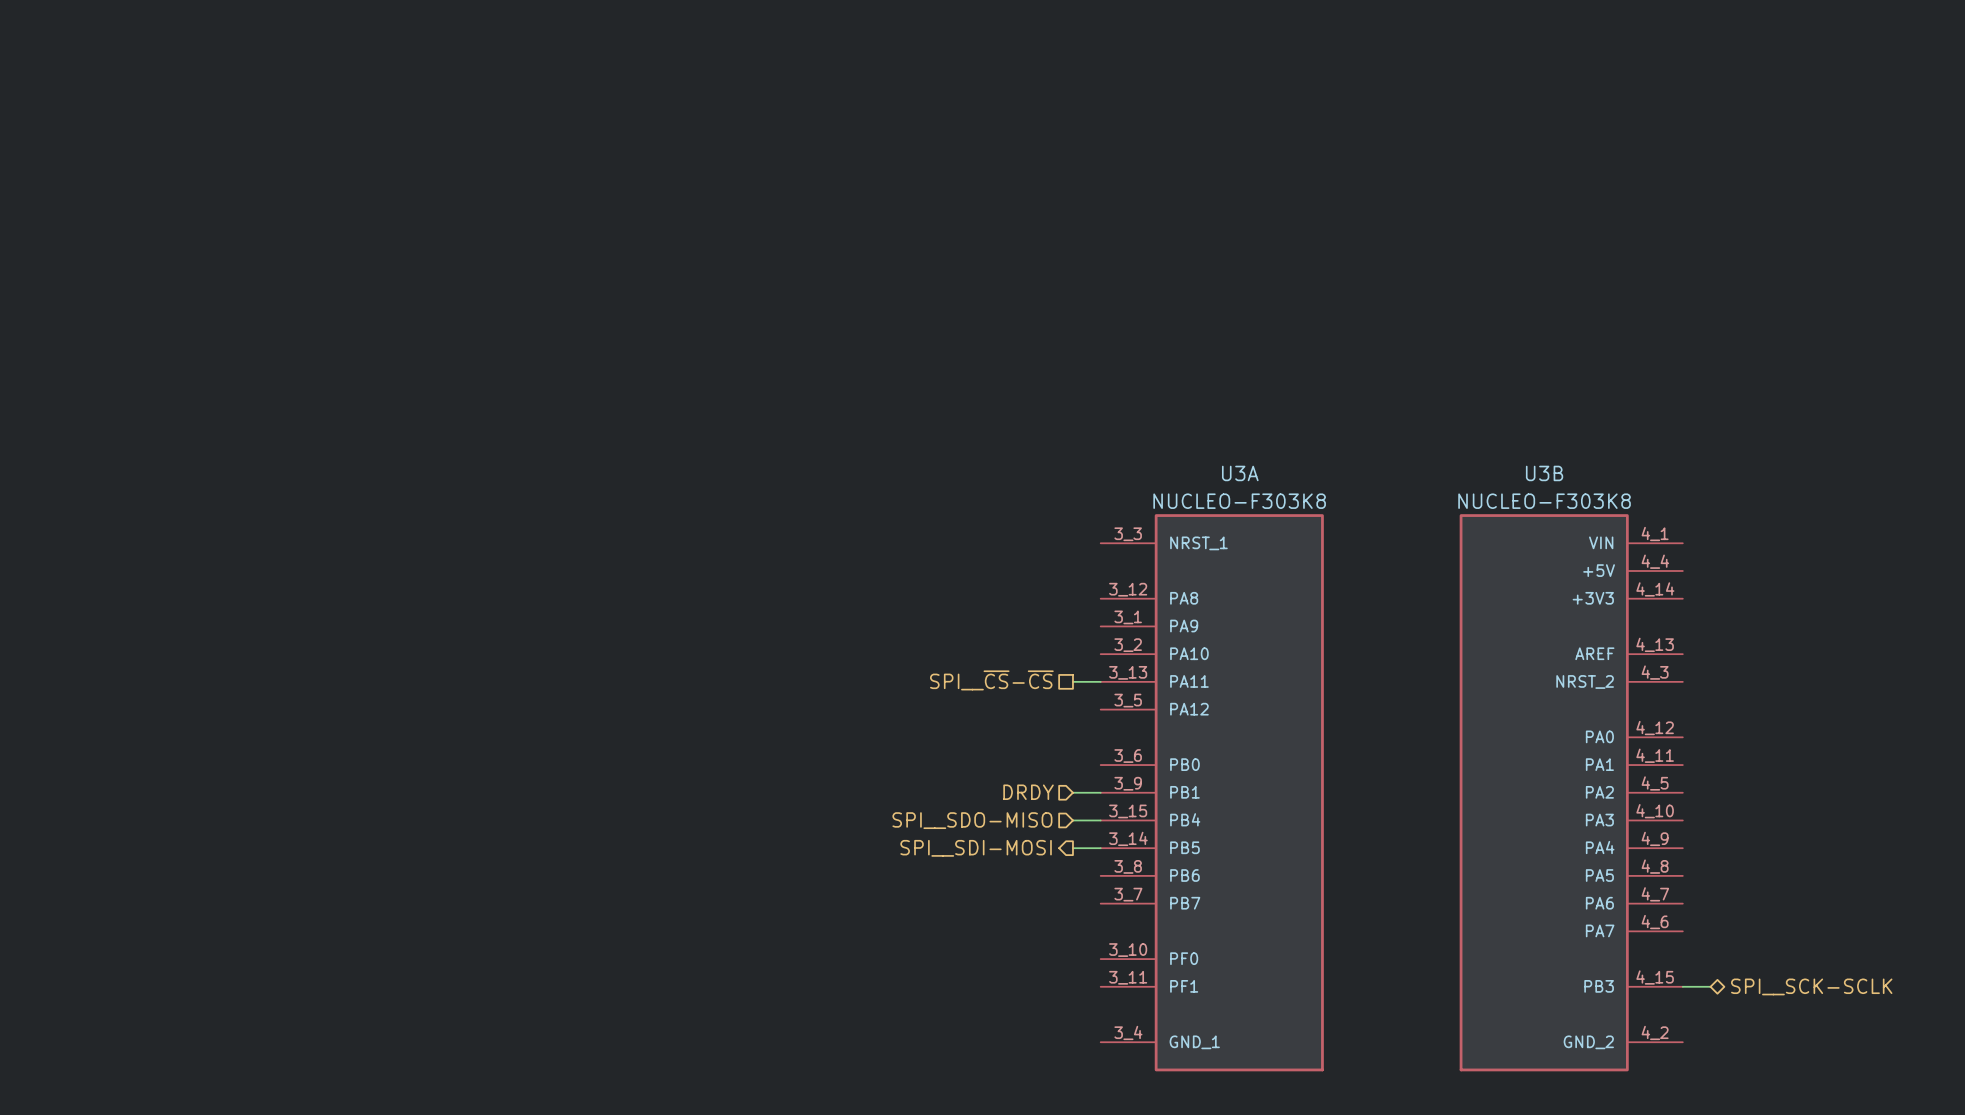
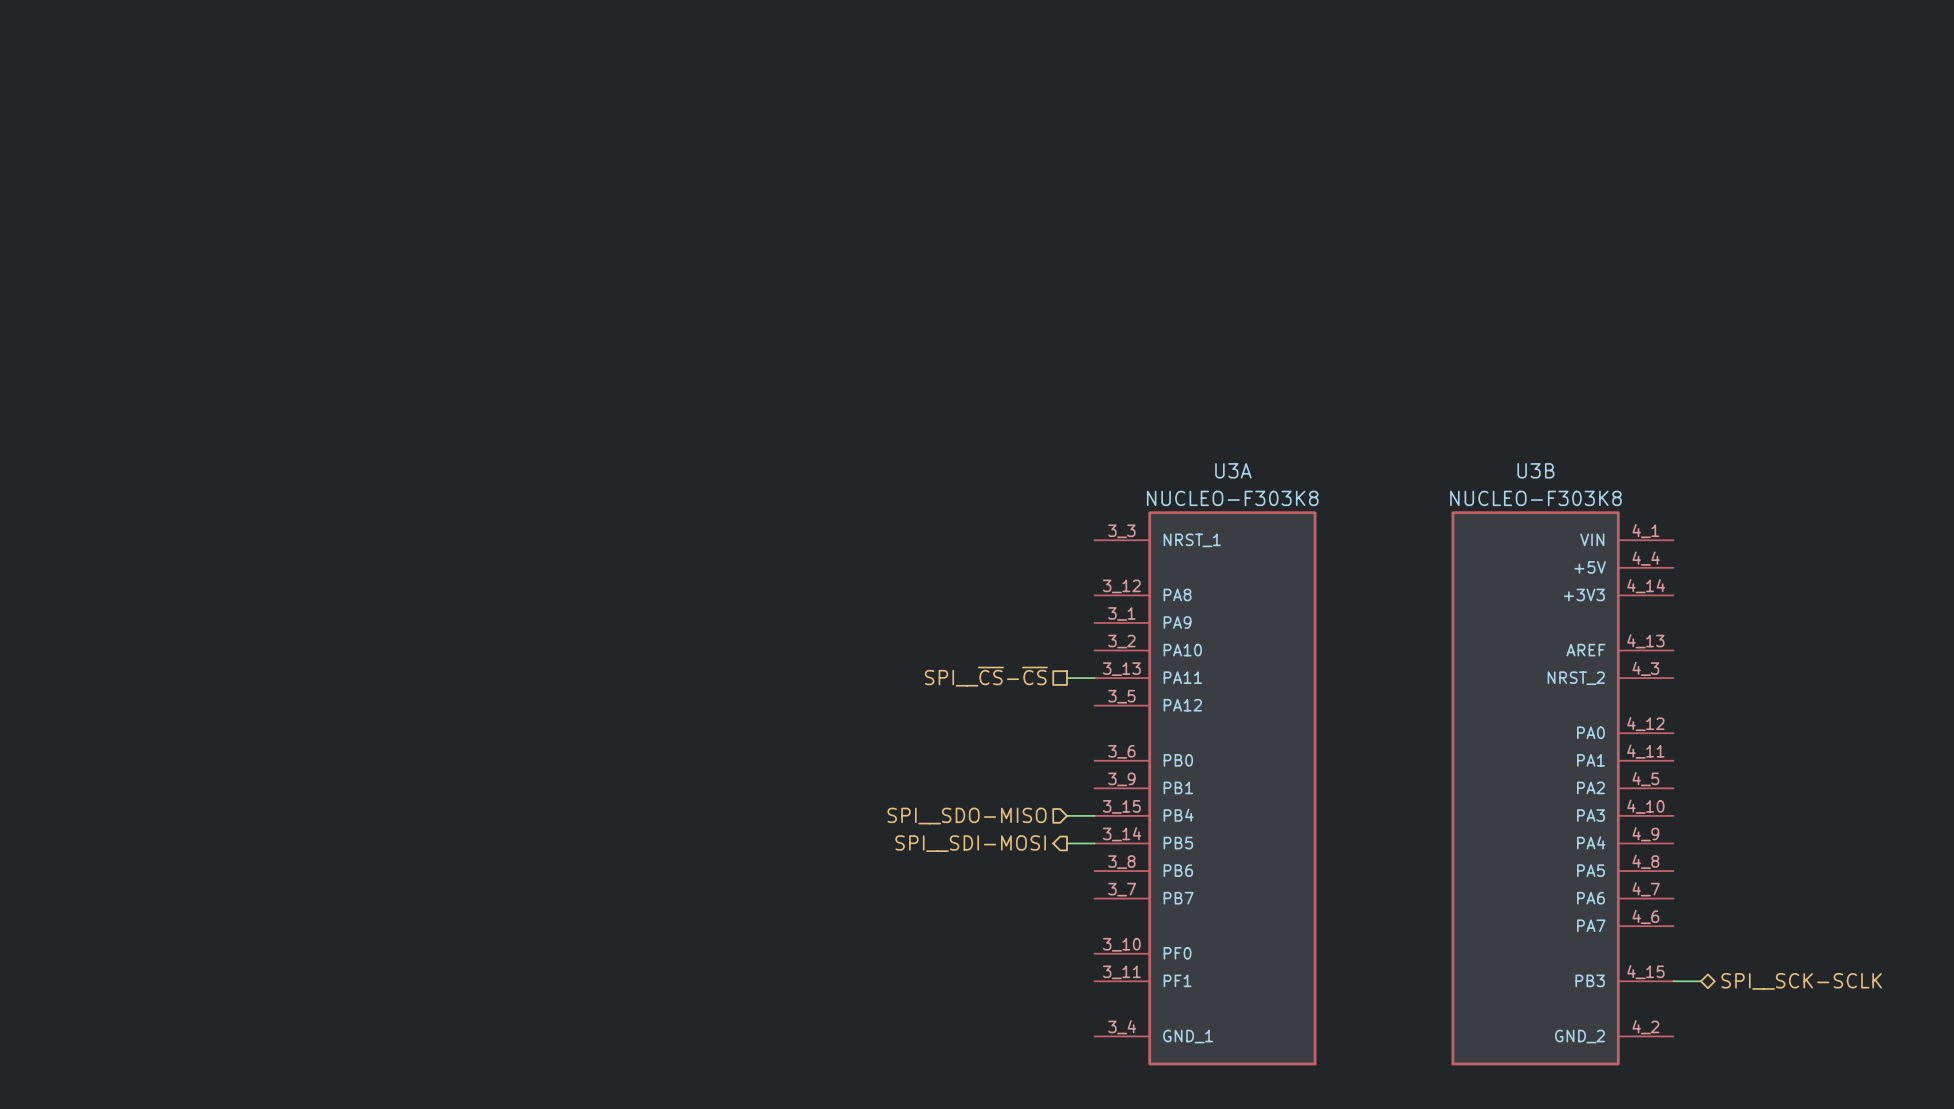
hierarchical label: DRDY (1028, 792) -> none
wire: (1072, 792) (1100, 792) -> none

